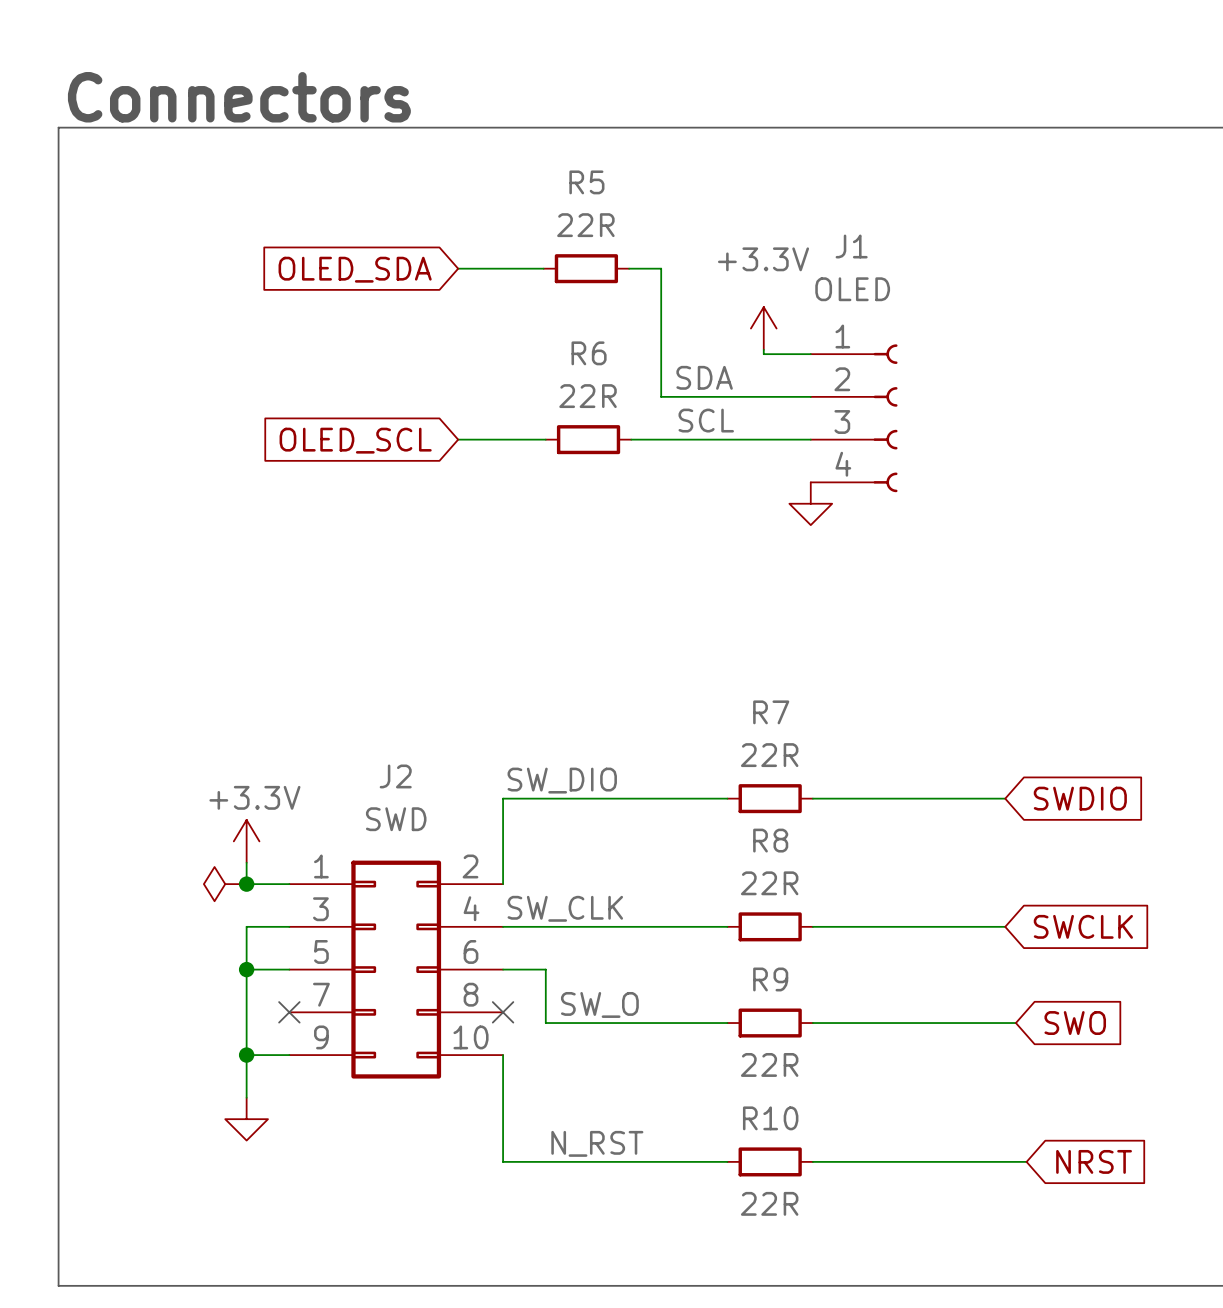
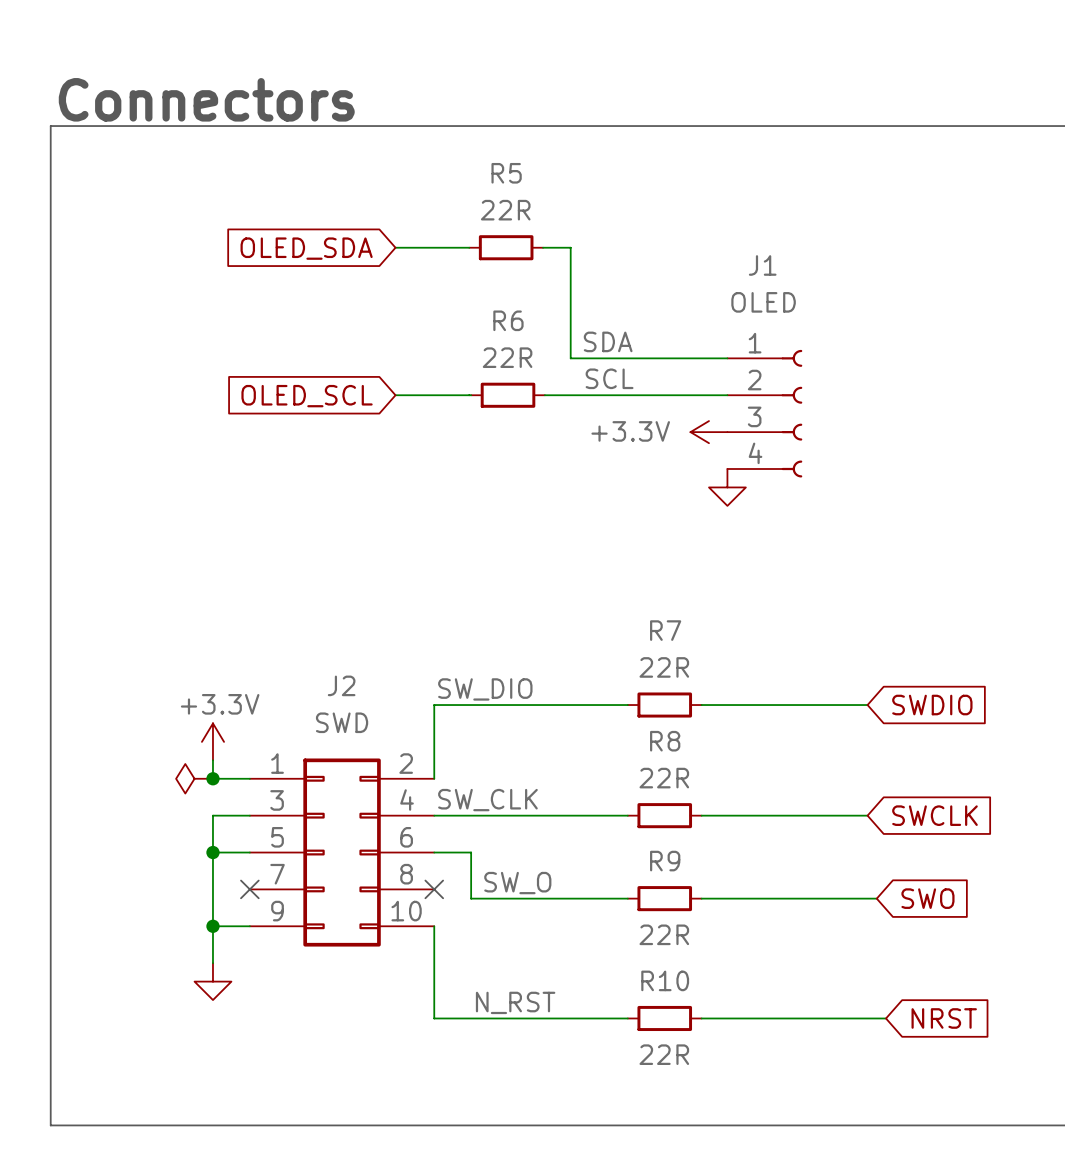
power symbol text position: +3.3V (763, 259) -> +3.3V (630, 431)
power symbol rotation: 0° (763, 328) -> 90° counterclockwise (708, 432)
power symbol position: +3.3V (763, 328) -> +3.3V (708, 432)
wire: (763, 349) (763, 354) (810, 354) -> none
J1 position: (854, 418) -> (764, 413)
power symbol position: (810, 503) -> (727, 487)

